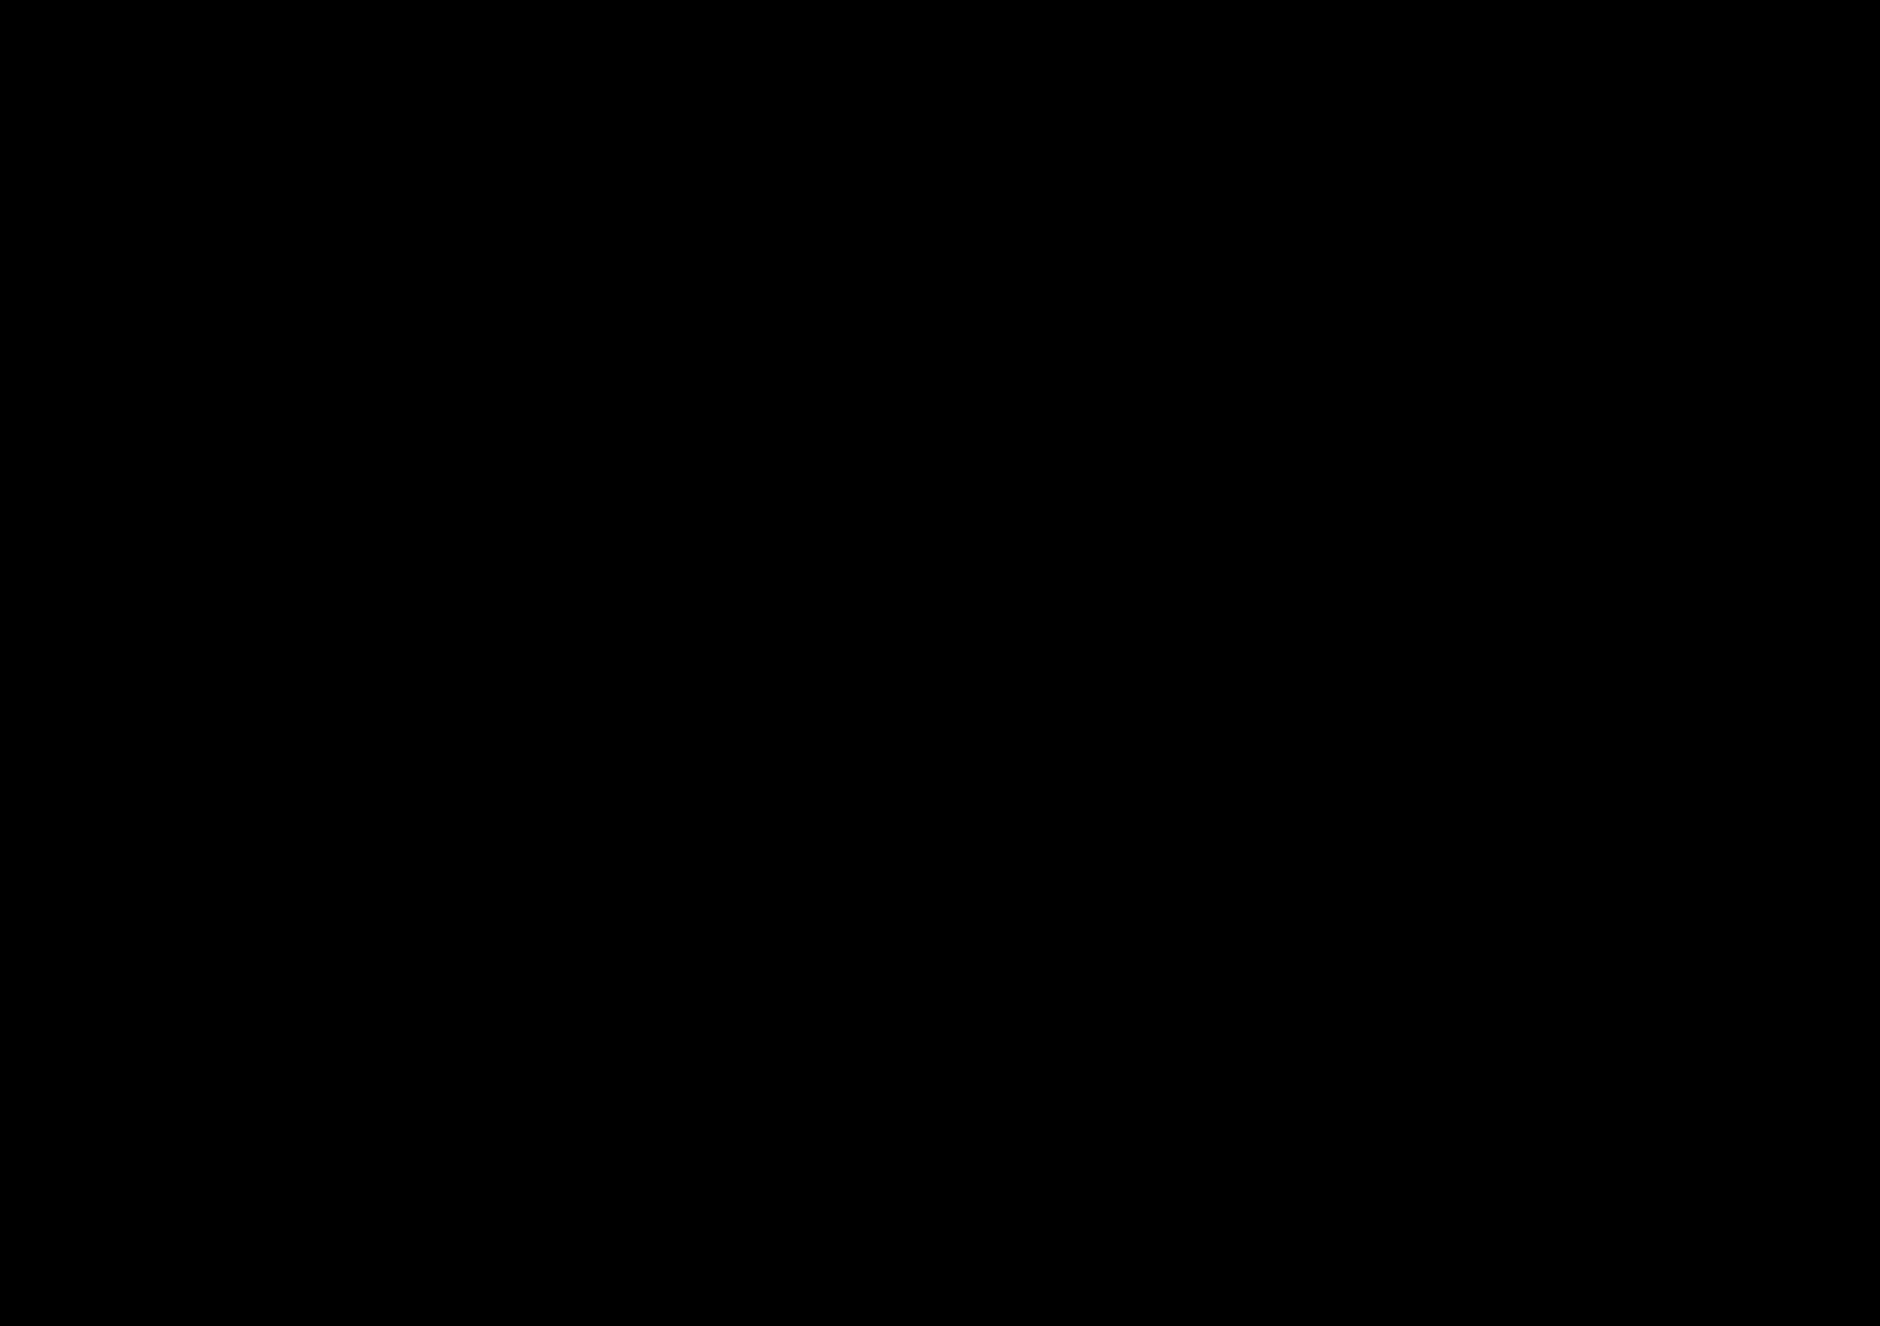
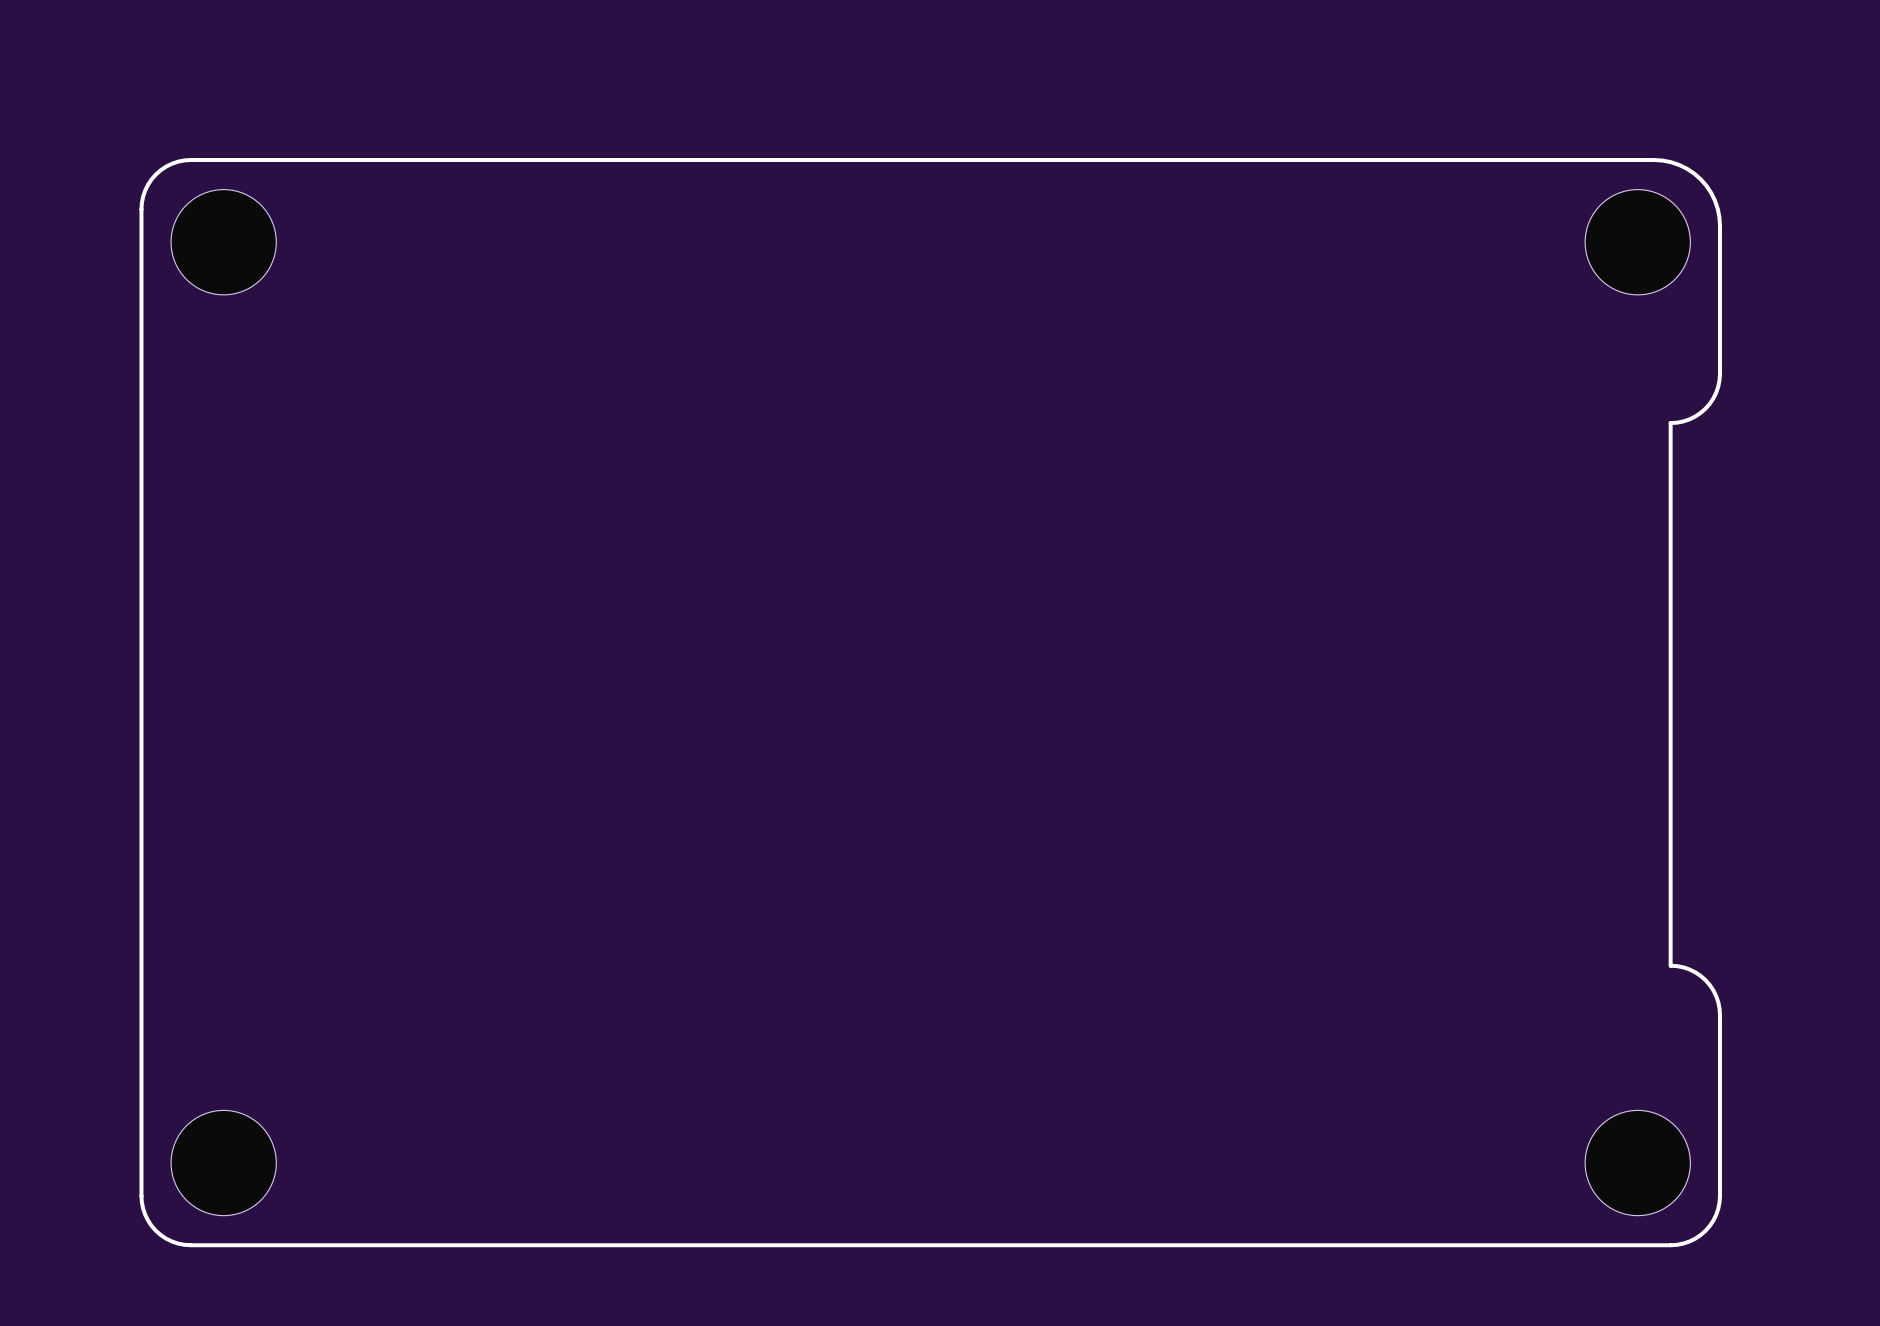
part: none -> (930, 702)

